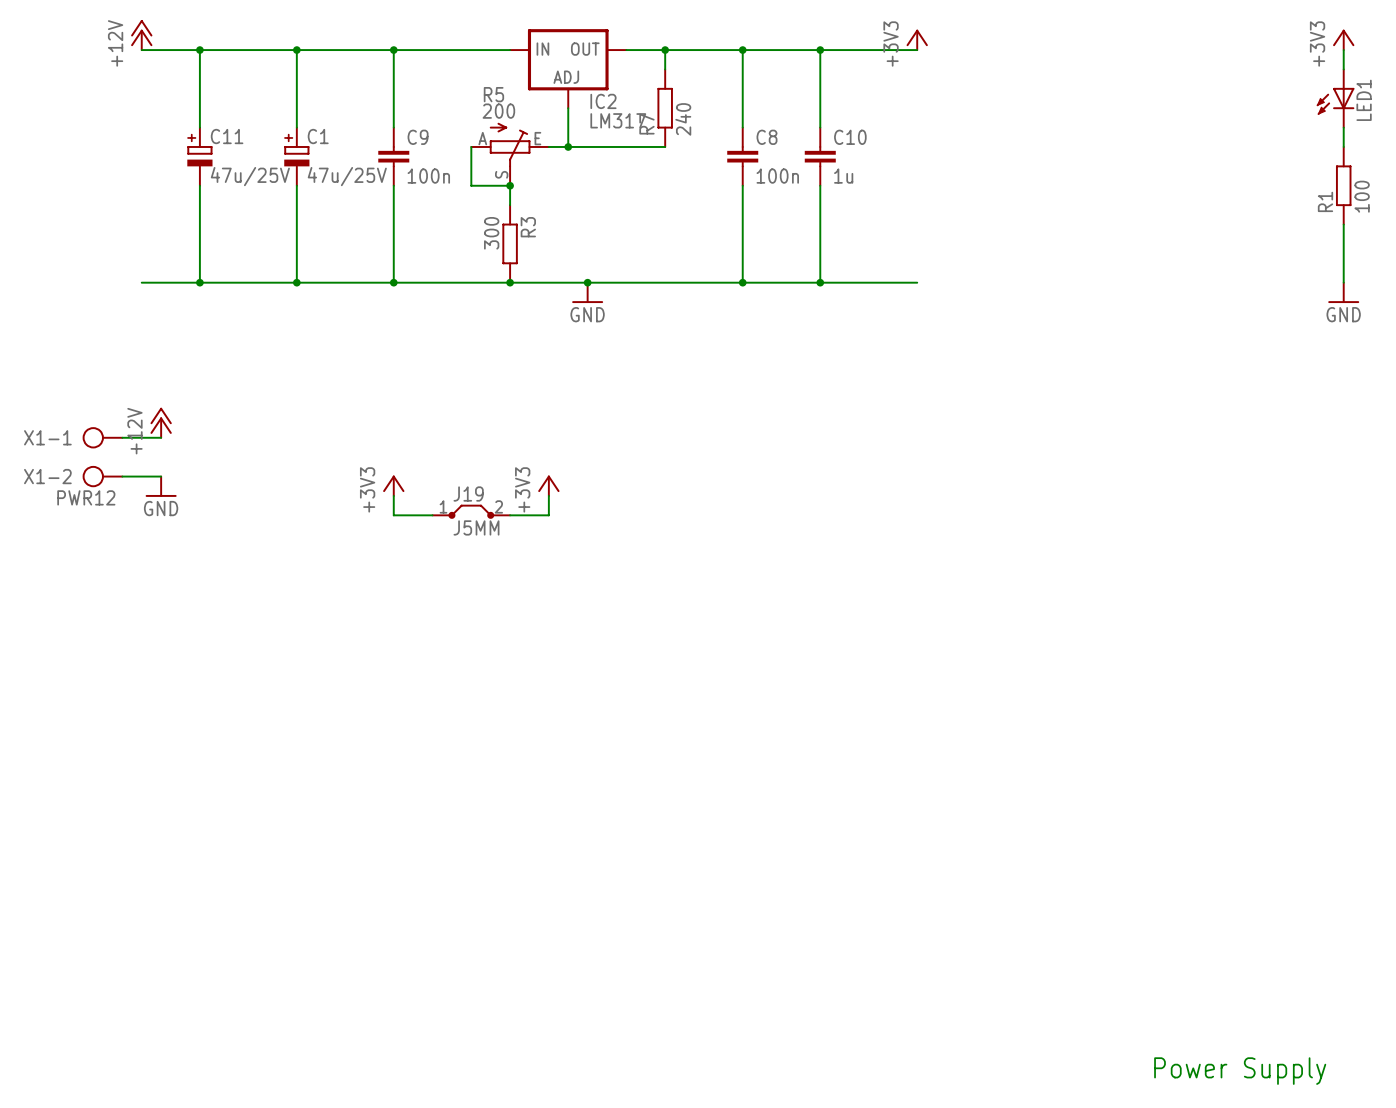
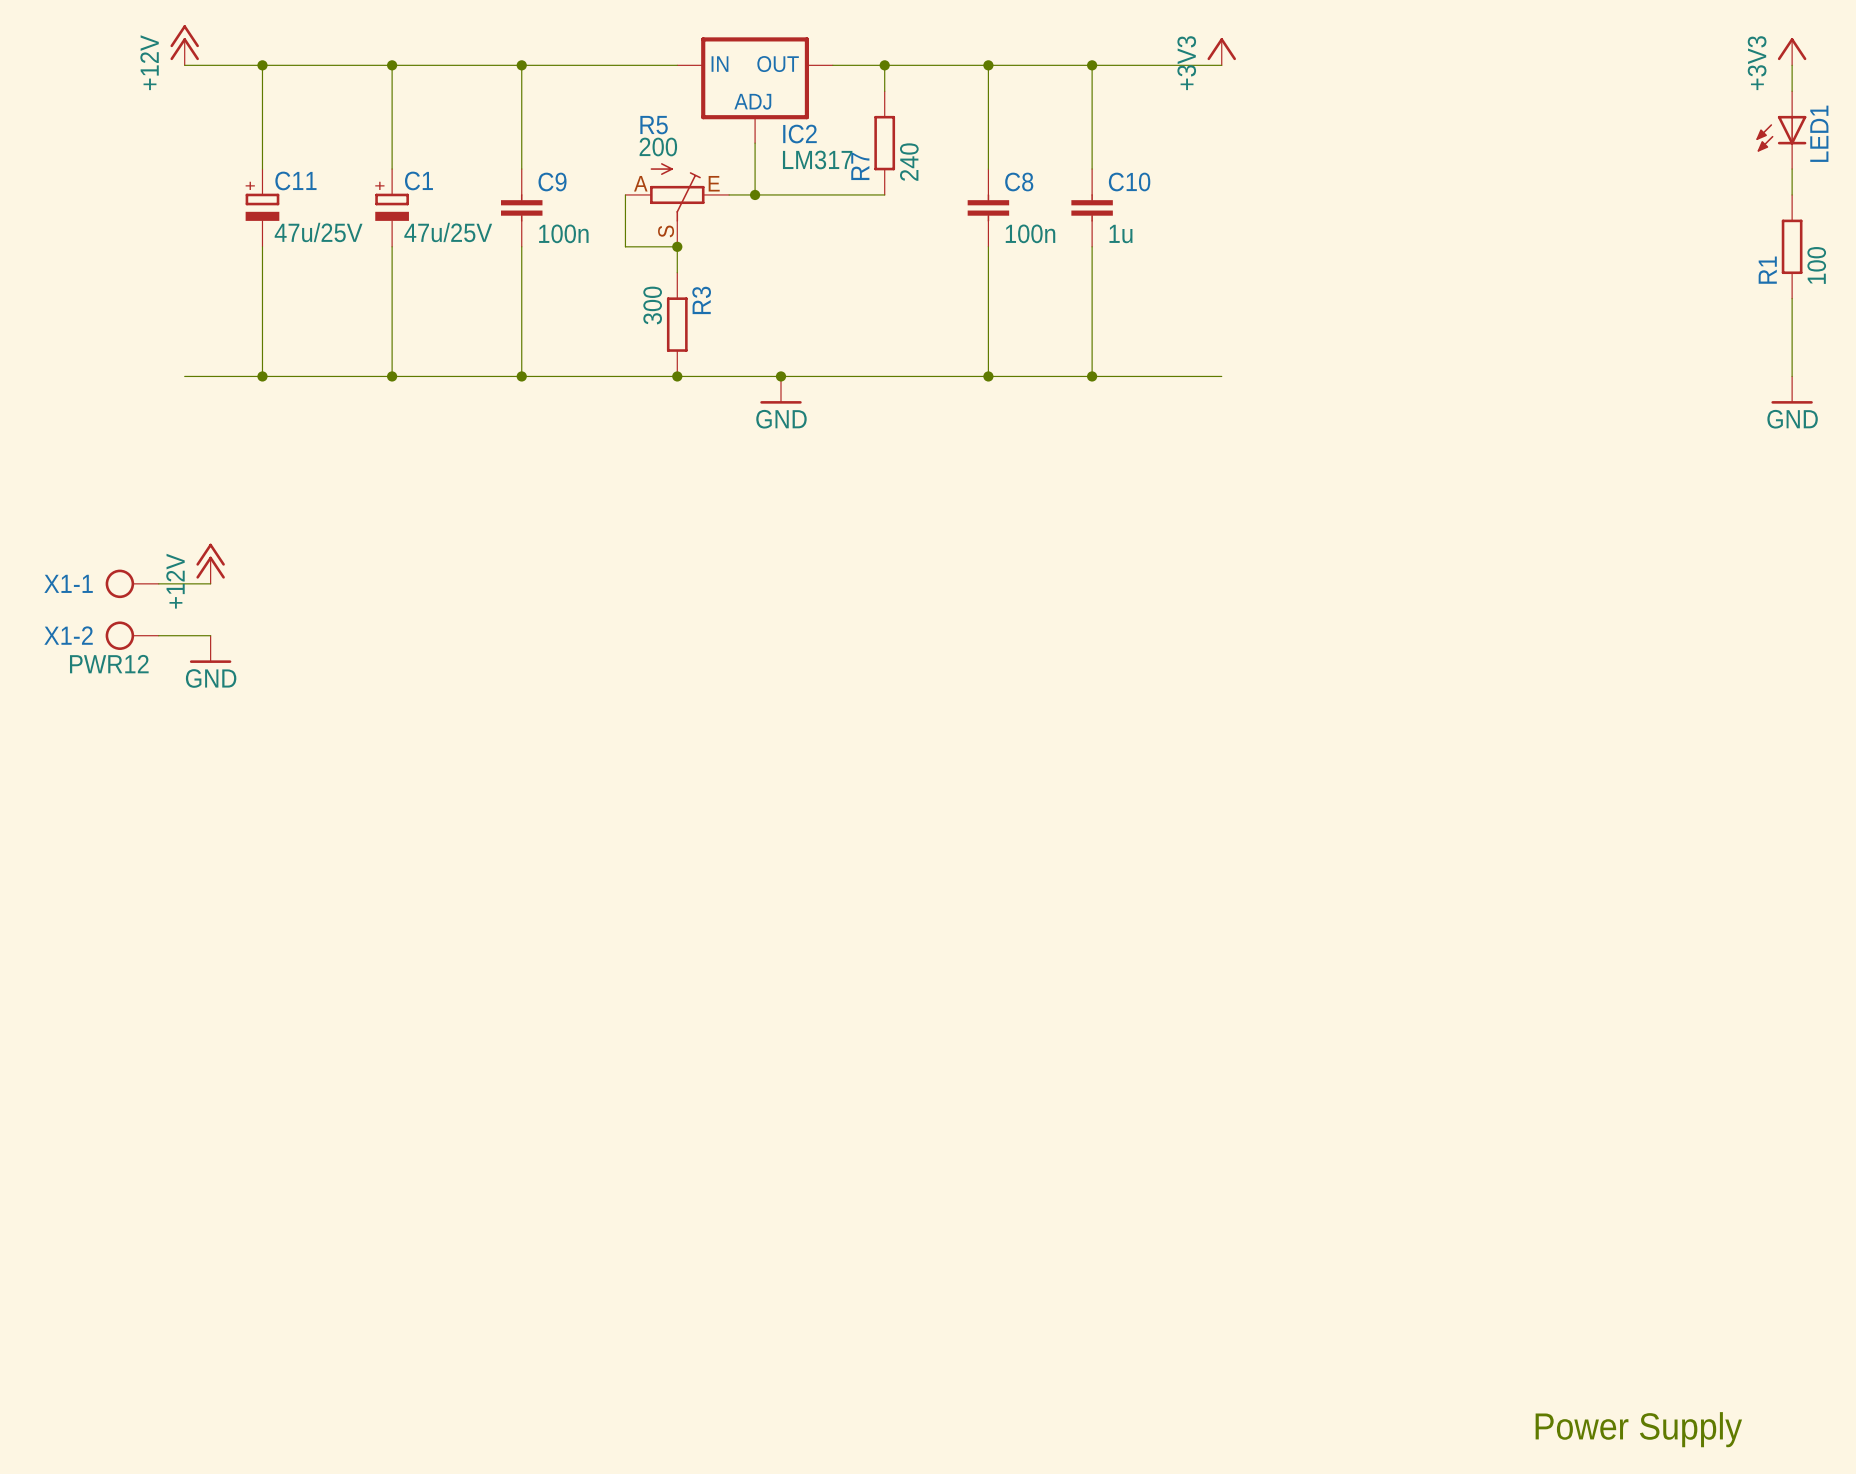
power symbol: +3V3 (393, 485) -> none
power symbol: +3V3 (548, 485) -> none
wire: (393, 495) (393, 515) (432, 515) -> none
wire: (548, 495) (548, 515) (510, 515) -> none
J19: J5MM (471, 511) -> none

